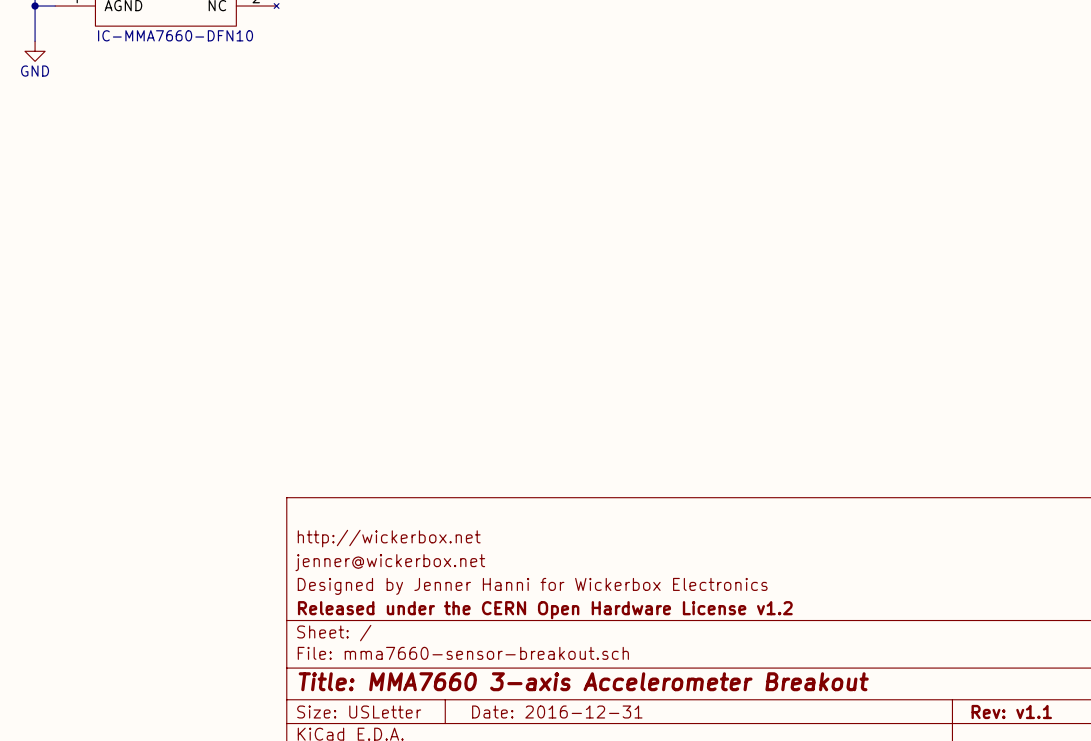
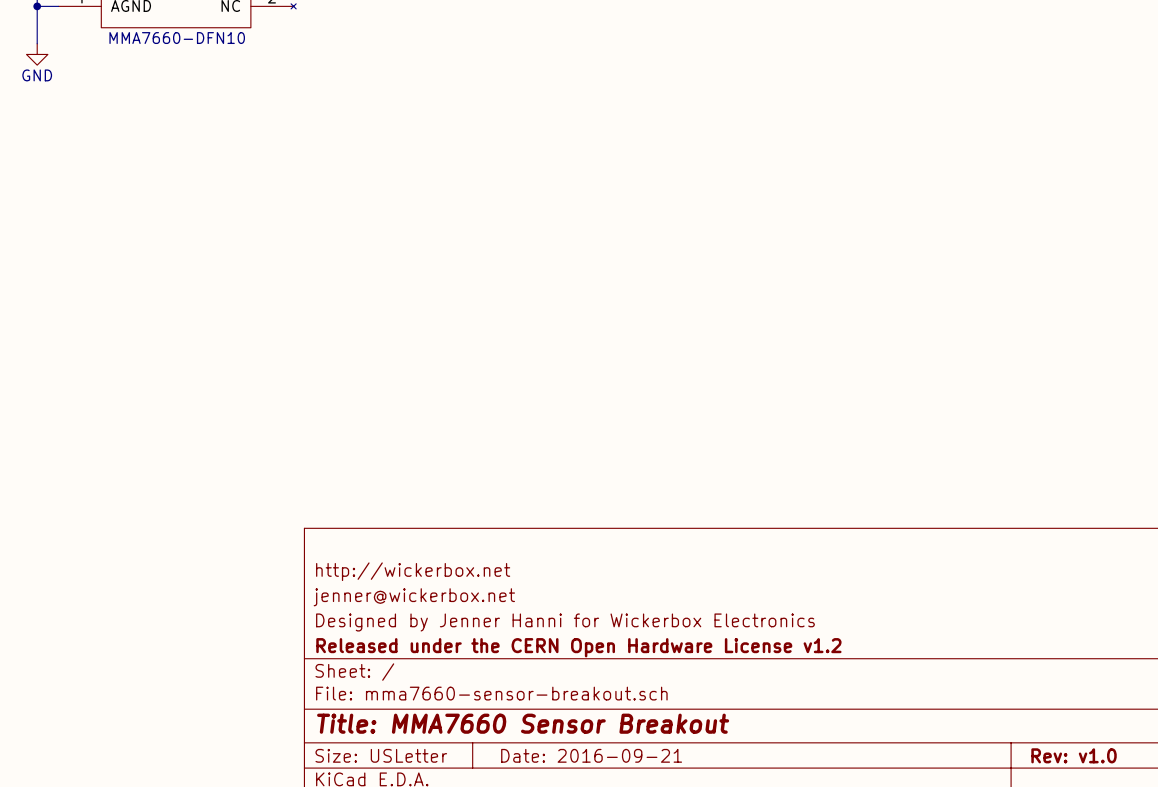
part value: IC-MMA7660-DFN10 (175, 35) -> MMA7660-DFN10 (177, 38)
title block: Title: MMA7660 3-axis Accelerometer Breakout (583, 681) -> Title: MMA7660 Sensor Breakout (523, 723)
title block: Date: 2016-12-31 (557, 712) -> Date: 2016-09-21 (591, 755)
title block: Rev: v1.1 (1011, 712) -> Rev: v1.0 (1074, 755)

